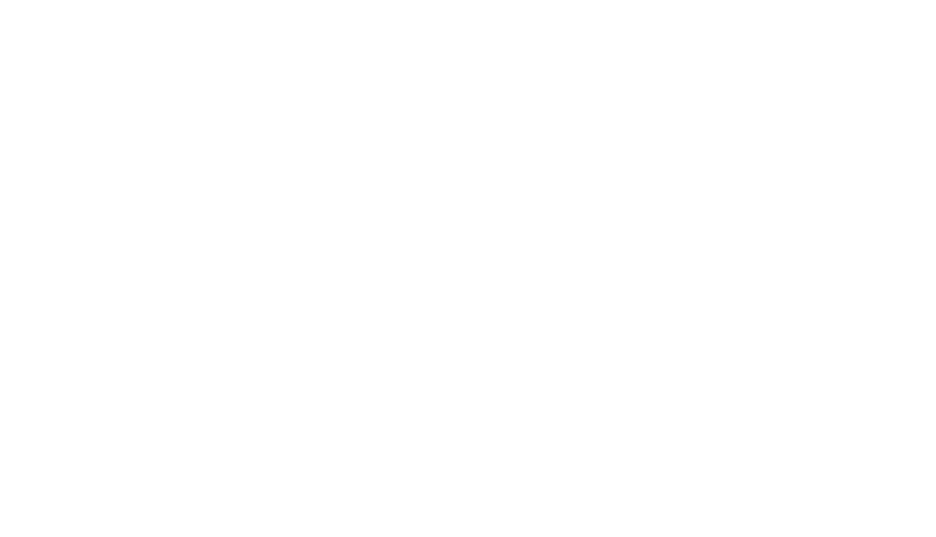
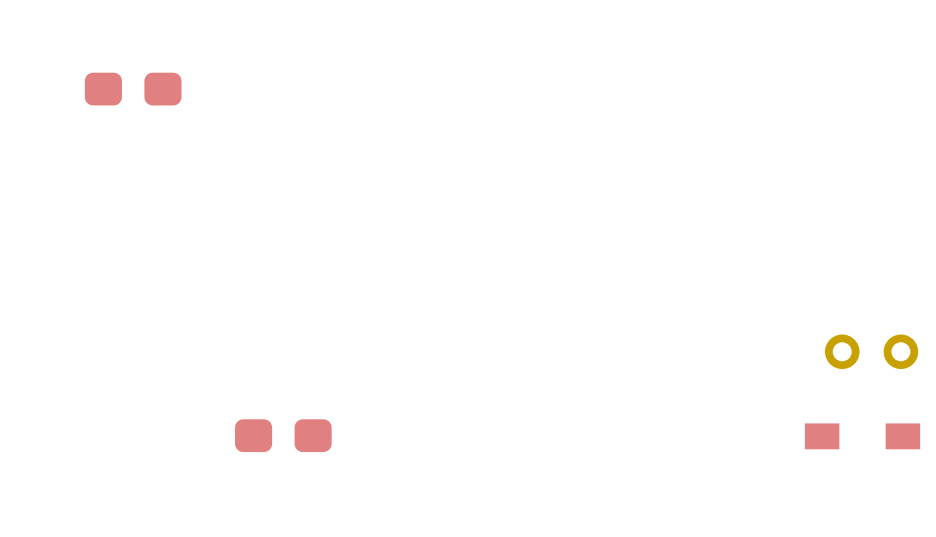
part: none -> (133, 89)
part: none -> (871, 351)
part: none -> (283, 435)
part: none -> (862, 436)

